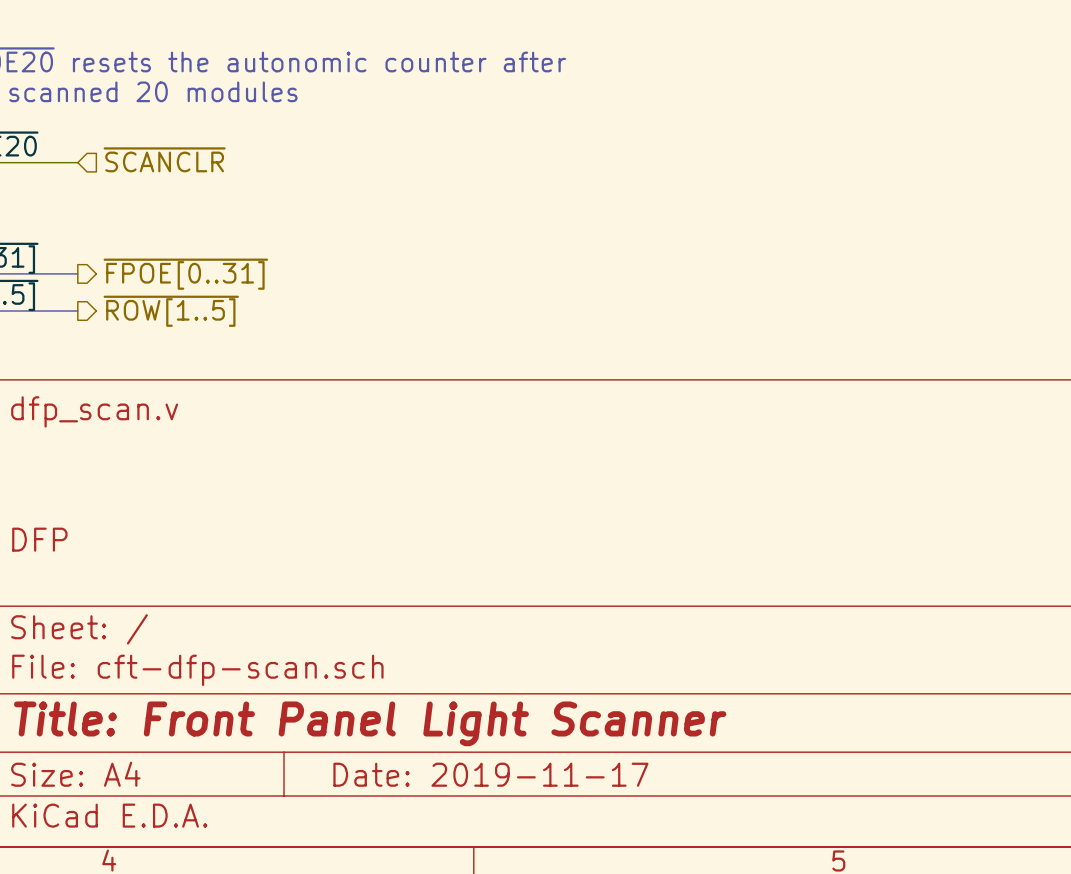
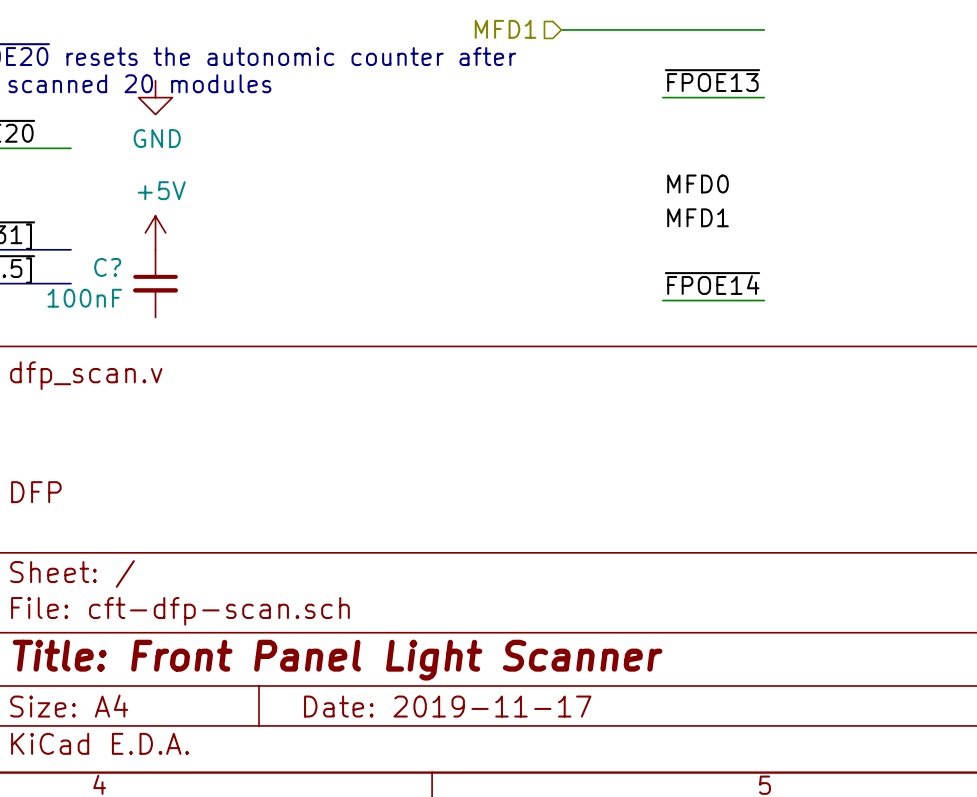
hierarchical label: none -> MFD1 (505, 29)
wire: none -> (561, 29) (764, 29)
label: none -> ~{FPOE13} (712, 80)
power symbol: none -> GND (155, 97)
wire: none -> (662, 97) (764, 97)
hierarchical label: ~{SCANCLR} (164, 159) -> none
label: none -> MFD0 (698, 183)
label: none -> MFD1 (698, 217)
power symbol: none -> +5V (155, 232)
hierarchical label: ~{FPOE[0..31]} (185, 274) -> none
label: none -> ~{FPOE14} (712, 283)
C?: none -> 100nF (155, 283)
hierarchical label: ~{ROW[1..5]} (171, 311) -> none
wire: none -> (662, 300) (764, 300)

